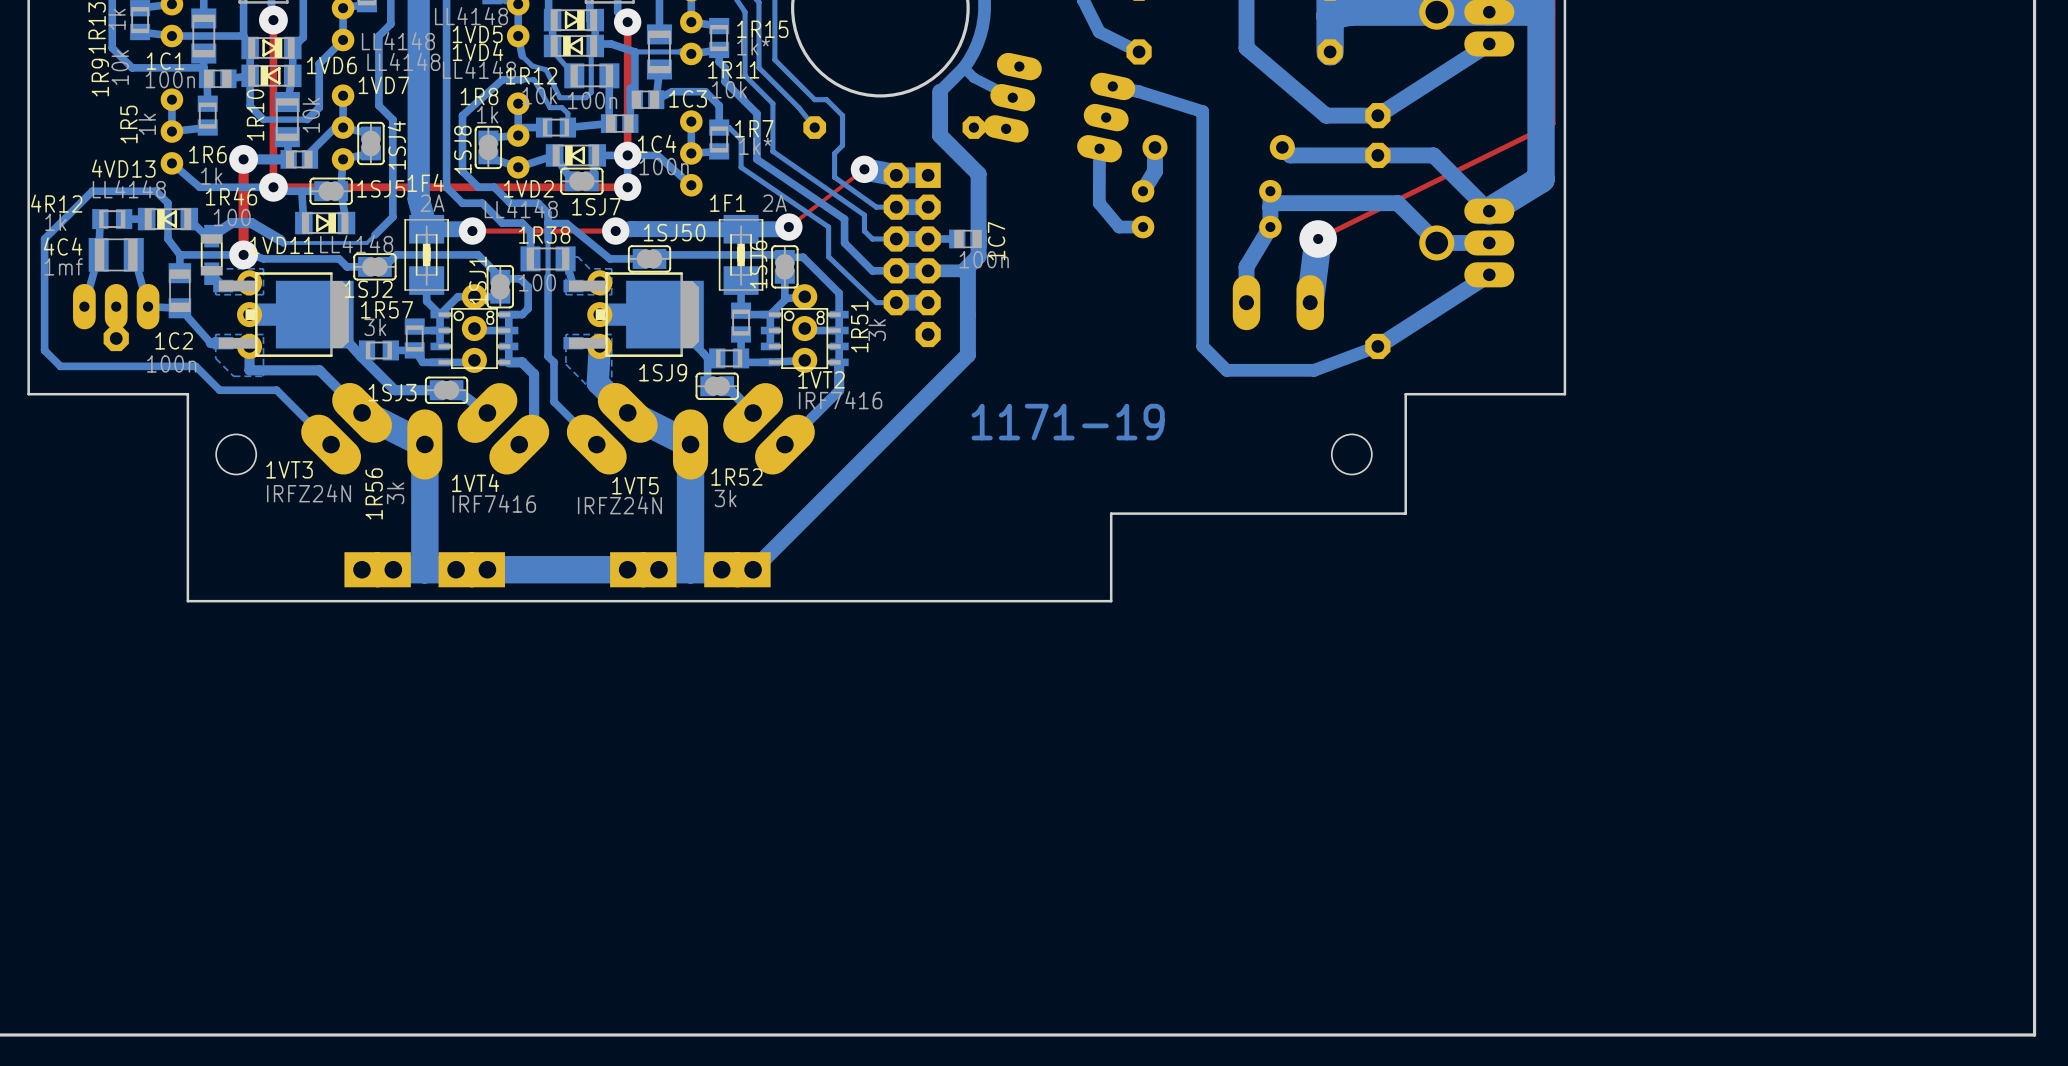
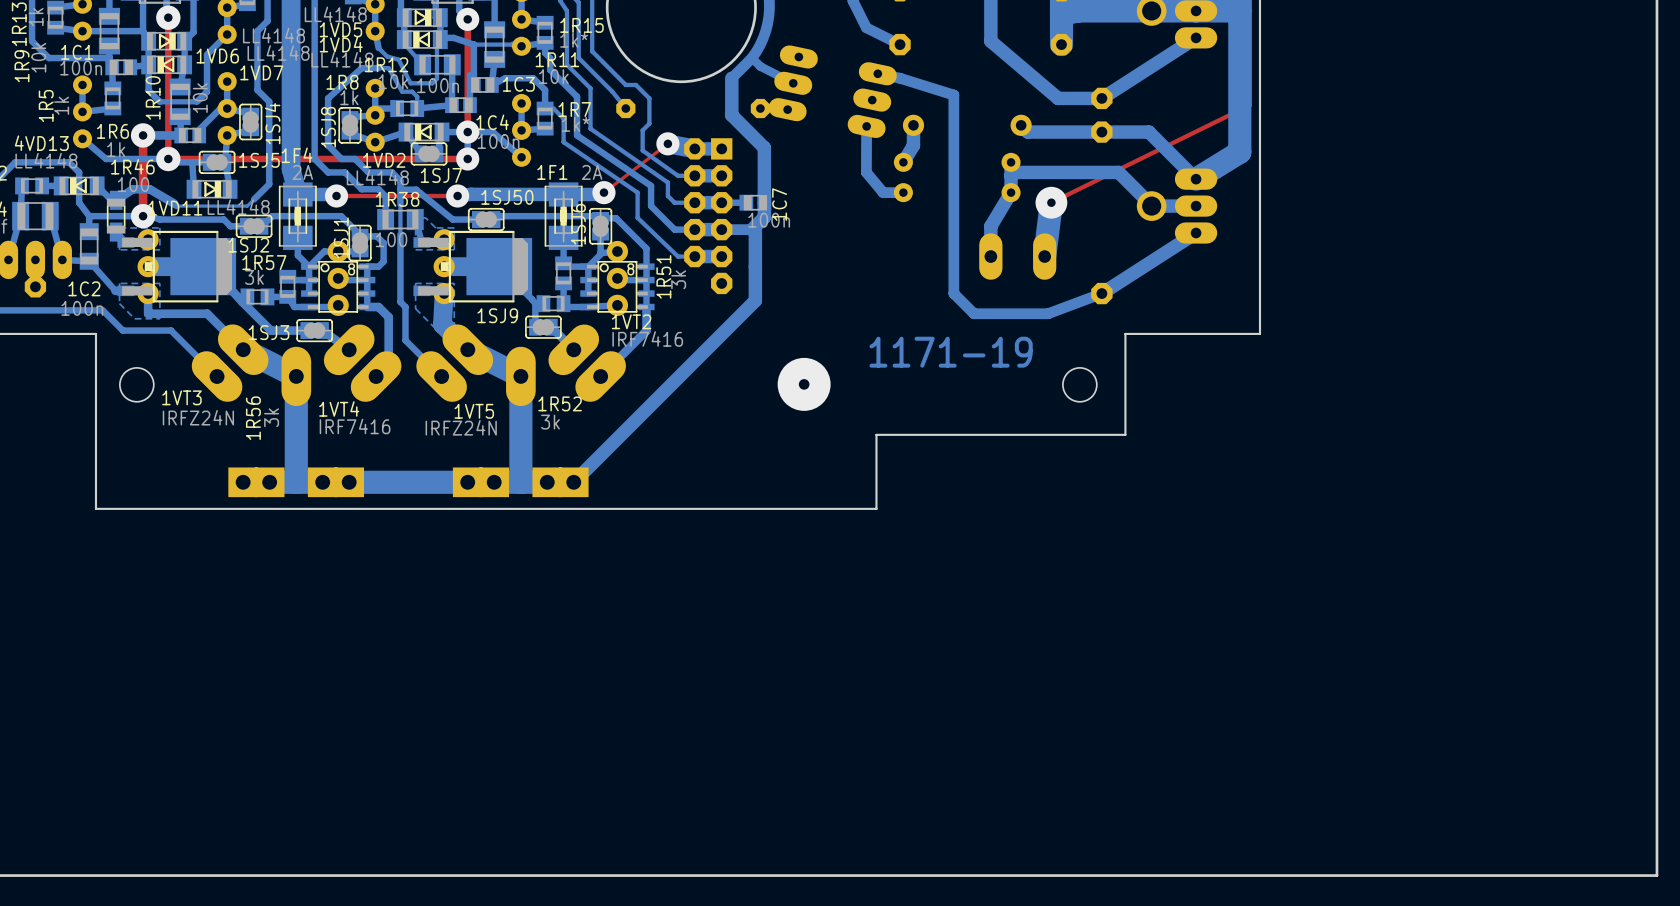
text position: 1171-19 (1068, 422) -> 1171-19 (951, 352)
via: none -> (804, 384)

